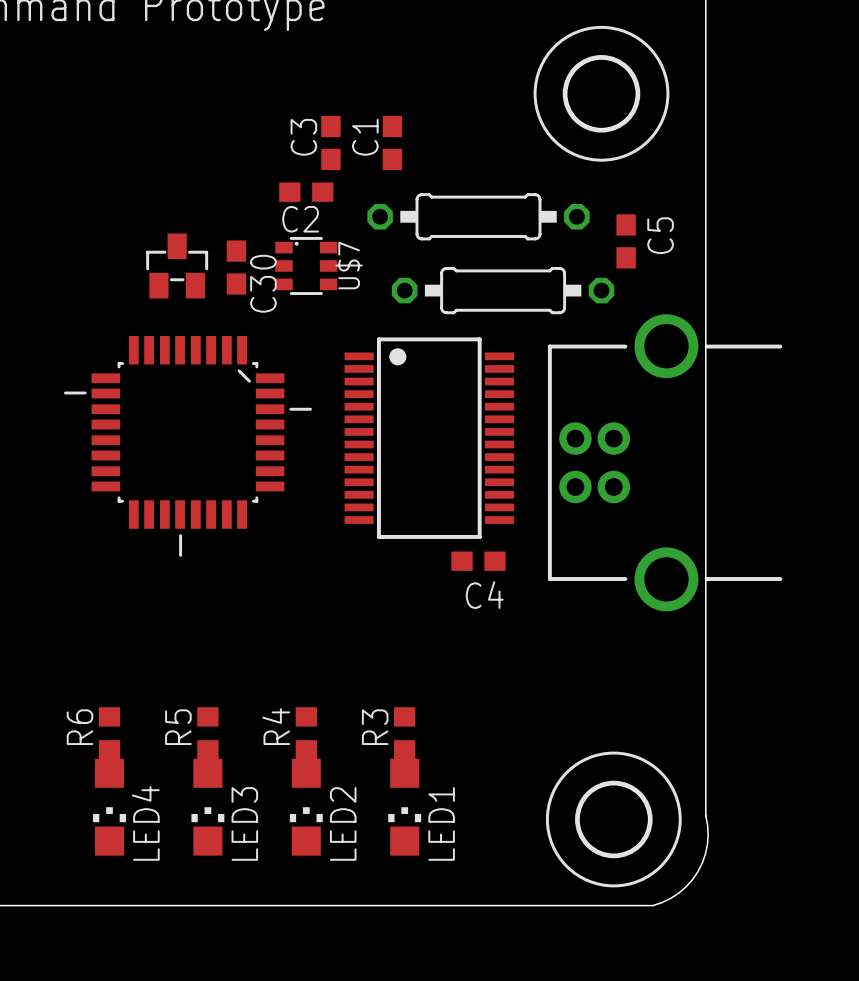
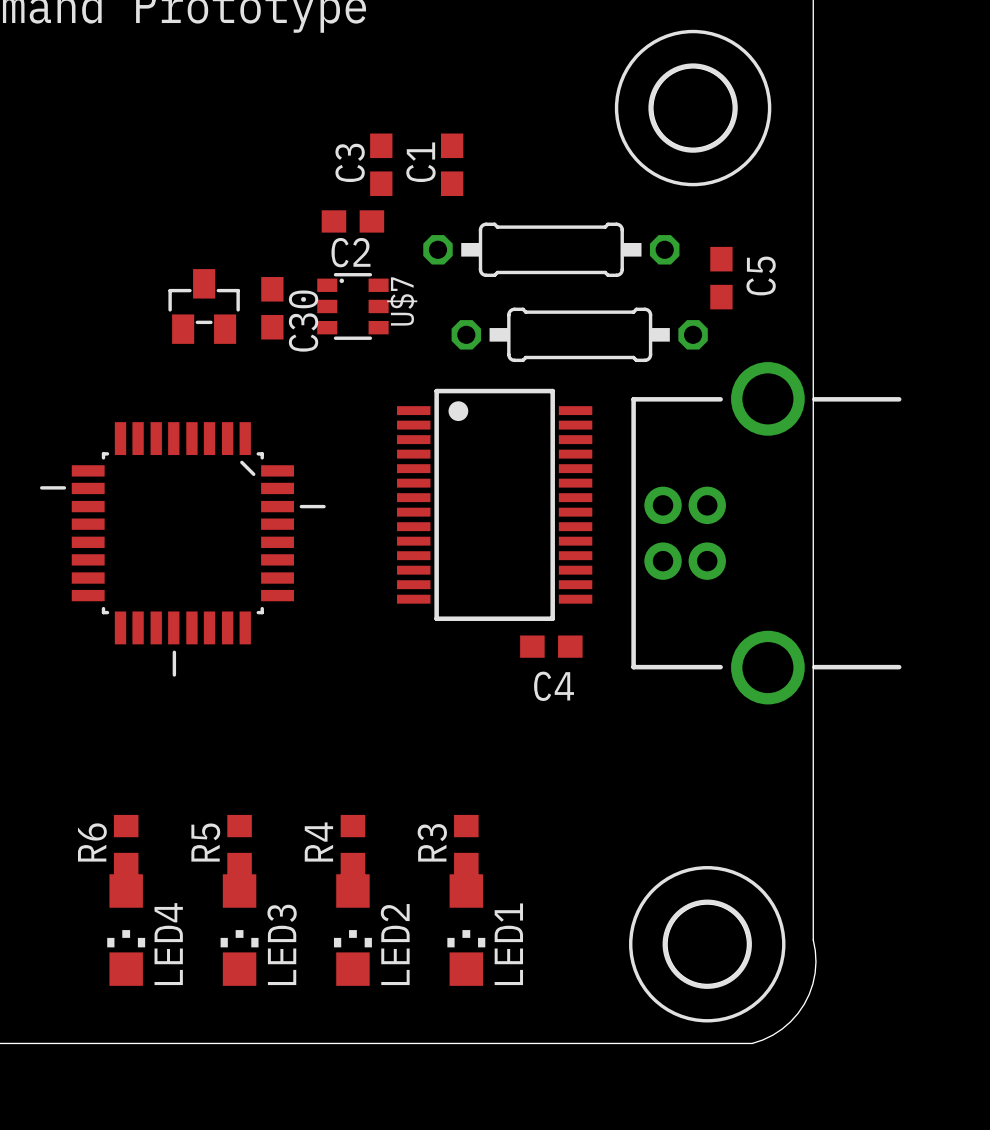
part position: (187, 446) -> (182, 549)

